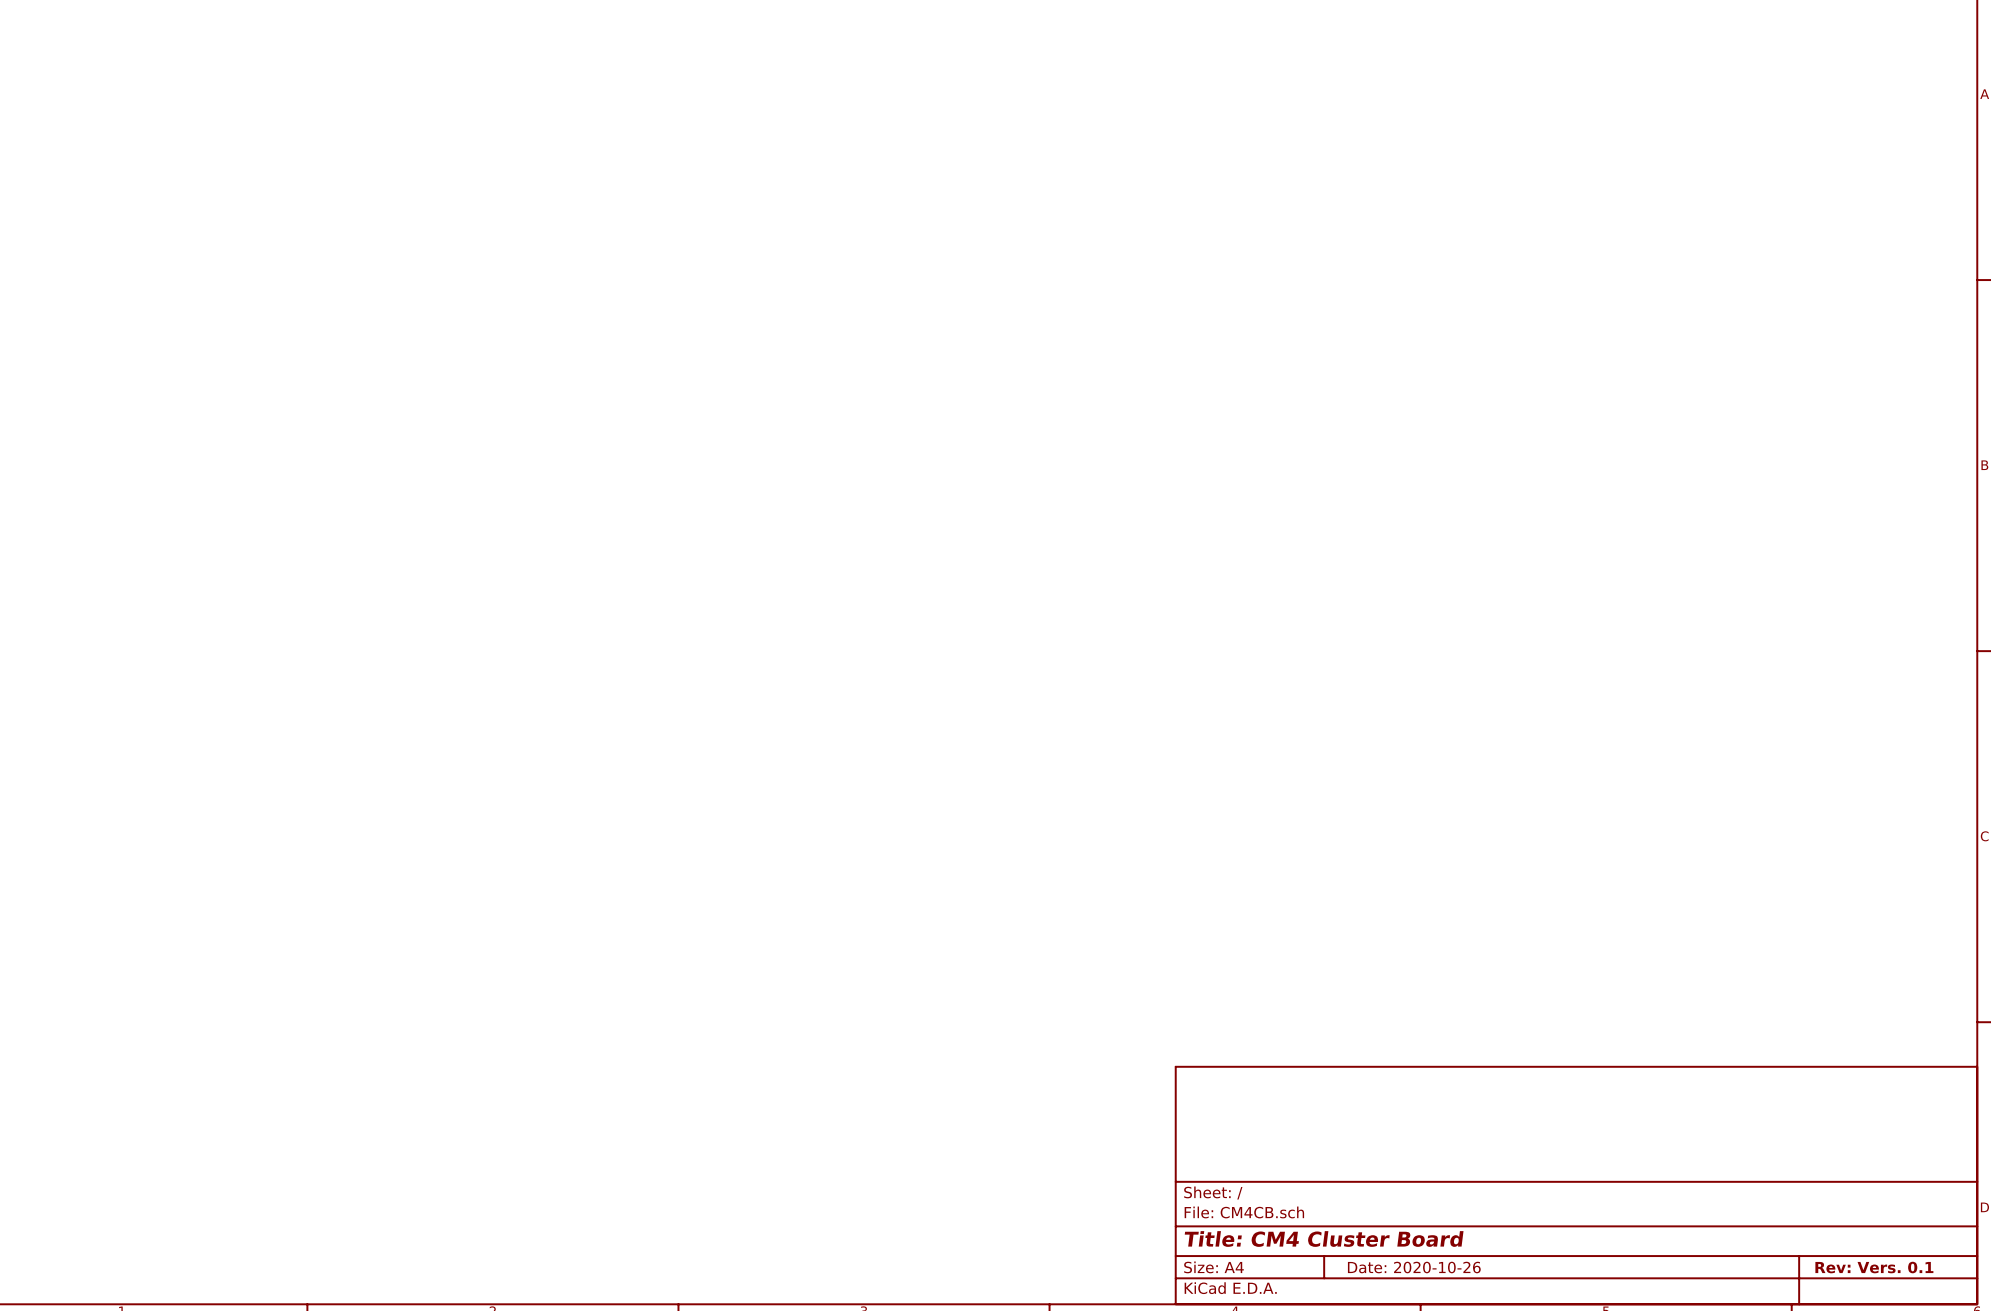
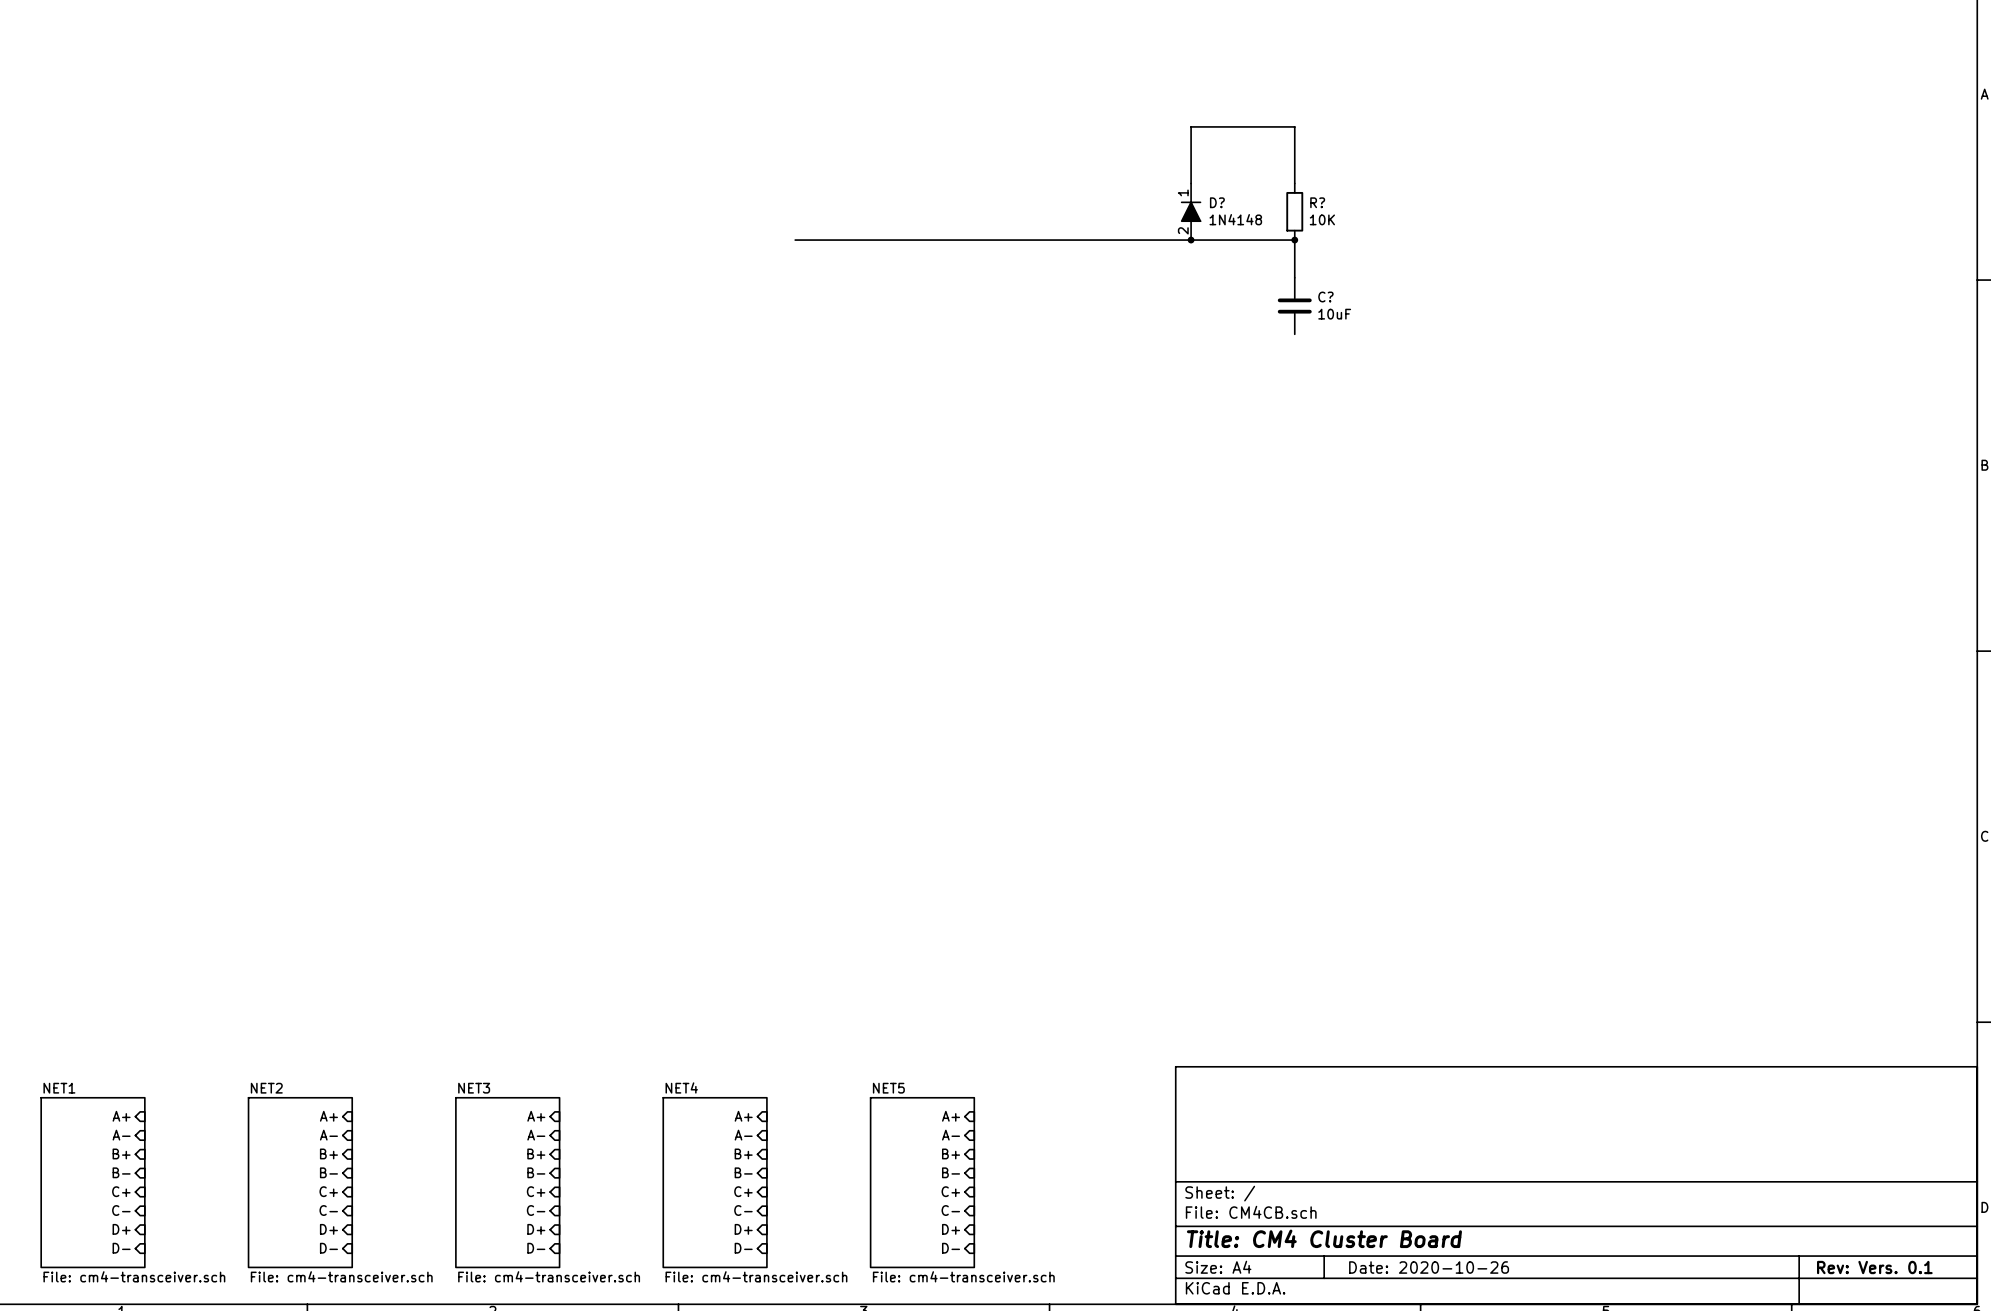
wire: none -> (1191, 183) (1191, 126) (1294, 126) (1294, 183)
D?: none -> 1N4148 (1191, 211)
R?: none -> 10K (1294, 211)
wire: none -> (795, 240) (1294, 240) (1294, 277)
junction: none -> (1191, 240)
junction: none -> (1294, 240)
C?: none -> 10uF (1294, 306)
sheet pin: none -> A+ (121, 1116)
sheet pin: none -> A+ (328, 1116)
sheet pin: none -> A+ (536, 1116)
sheet pin: none -> A+ (743, 1116)
sheet pin: none -> A+ (951, 1116)
sheet pin: none -> A- (121, 1135)
sheet pin: none -> A- (328, 1135)
sheet pin: none -> A- (536, 1135)
sheet pin: none -> A- (743, 1135)
sheet pin: none -> A- (951, 1135)
sheet pin: none -> B+ (121, 1153)
sheet pin: none -> B+ (328, 1153)
sheet pin: none -> B+ (536, 1153)
sheet pin: none -> B+ (743, 1153)
sheet pin: none -> B+ (951, 1153)
sheet pin: none -> B- (121, 1172)
sheet pin: none -> B- (328, 1172)
sheet pin: none -> B- (536, 1172)
sheet pin: none -> B- (743, 1172)
sheet pin: none -> B- (951, 1172)
sheet NET1: none -> File: cm4-transceiver.sch (93, 1182)
sheet NET2: none -> File: cm4-transceiver.sch (300, 1182)
sheet NET3: none -> File: cm4-transceiver.sch (507, 1182)
sheet NET4: none -> File: cm4-transceiver.sch (715, 1182)
sheet NET5: none -> File: cm4-transceiver.sch (922, 1182)
sheet pin: none -> C+ (121, 1191)
sheet pin: none -> C+ (328, 1191)
sheet pin: none -> C+ (536, 1191)
sheet pin: none -> C+ (743, 1191)
sheet pin: none -> C+ (950, 1191)
sheet pin: none -> C- (121, 1210)
sheet pin: none -> C- (328, 1210)
sheet pin: none -> C- (536, 1210)
sheet pin: none -> C- (743, 1210)
sheet pin: none -> C- (950, 1210)
sheet pin: none -> D+ (121, 1229)
sheet pin: none -> D+ (328, 1229)
sheet pin: none -> D+ (536, 1229)
sheet pin: none -> D+ (743, 1229)
sheet pin: none -> D+ (951, 1229)
sheet pin: none -> D- (121, 1248)
sheet pin: none -> D- (328, 1248)
sheet pin: none -> D- (536, 1248)
sheet pin: none -> D- (743, 1248)
sheet pin: none -> D- (951, 1248)

